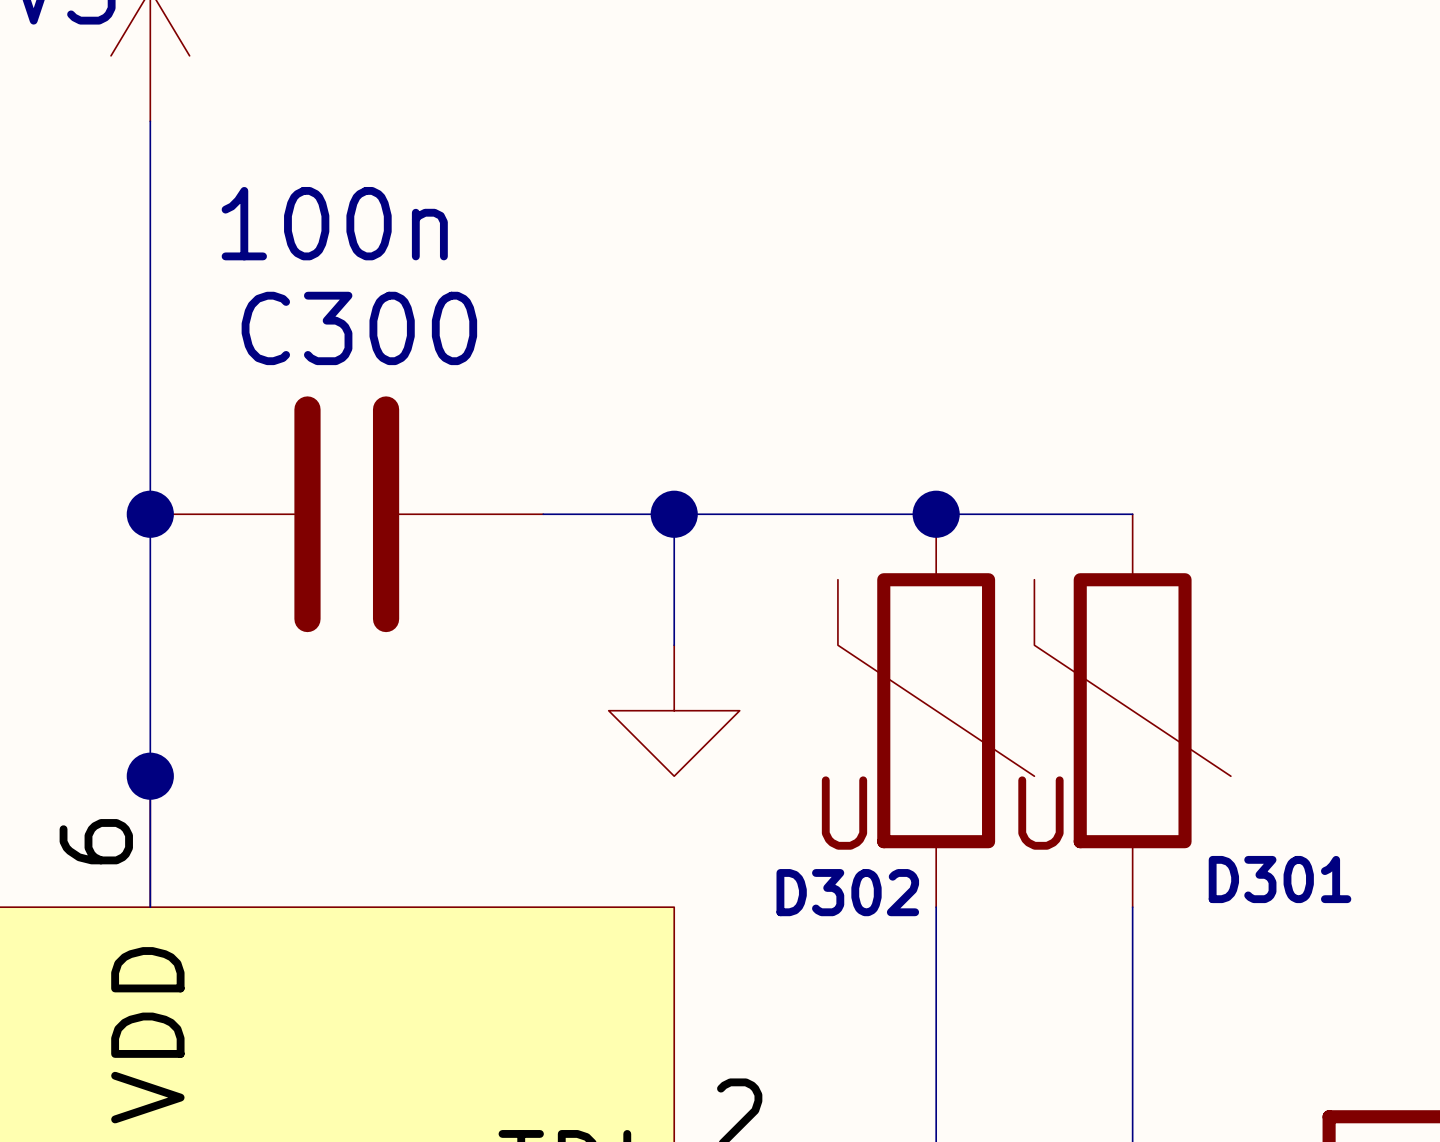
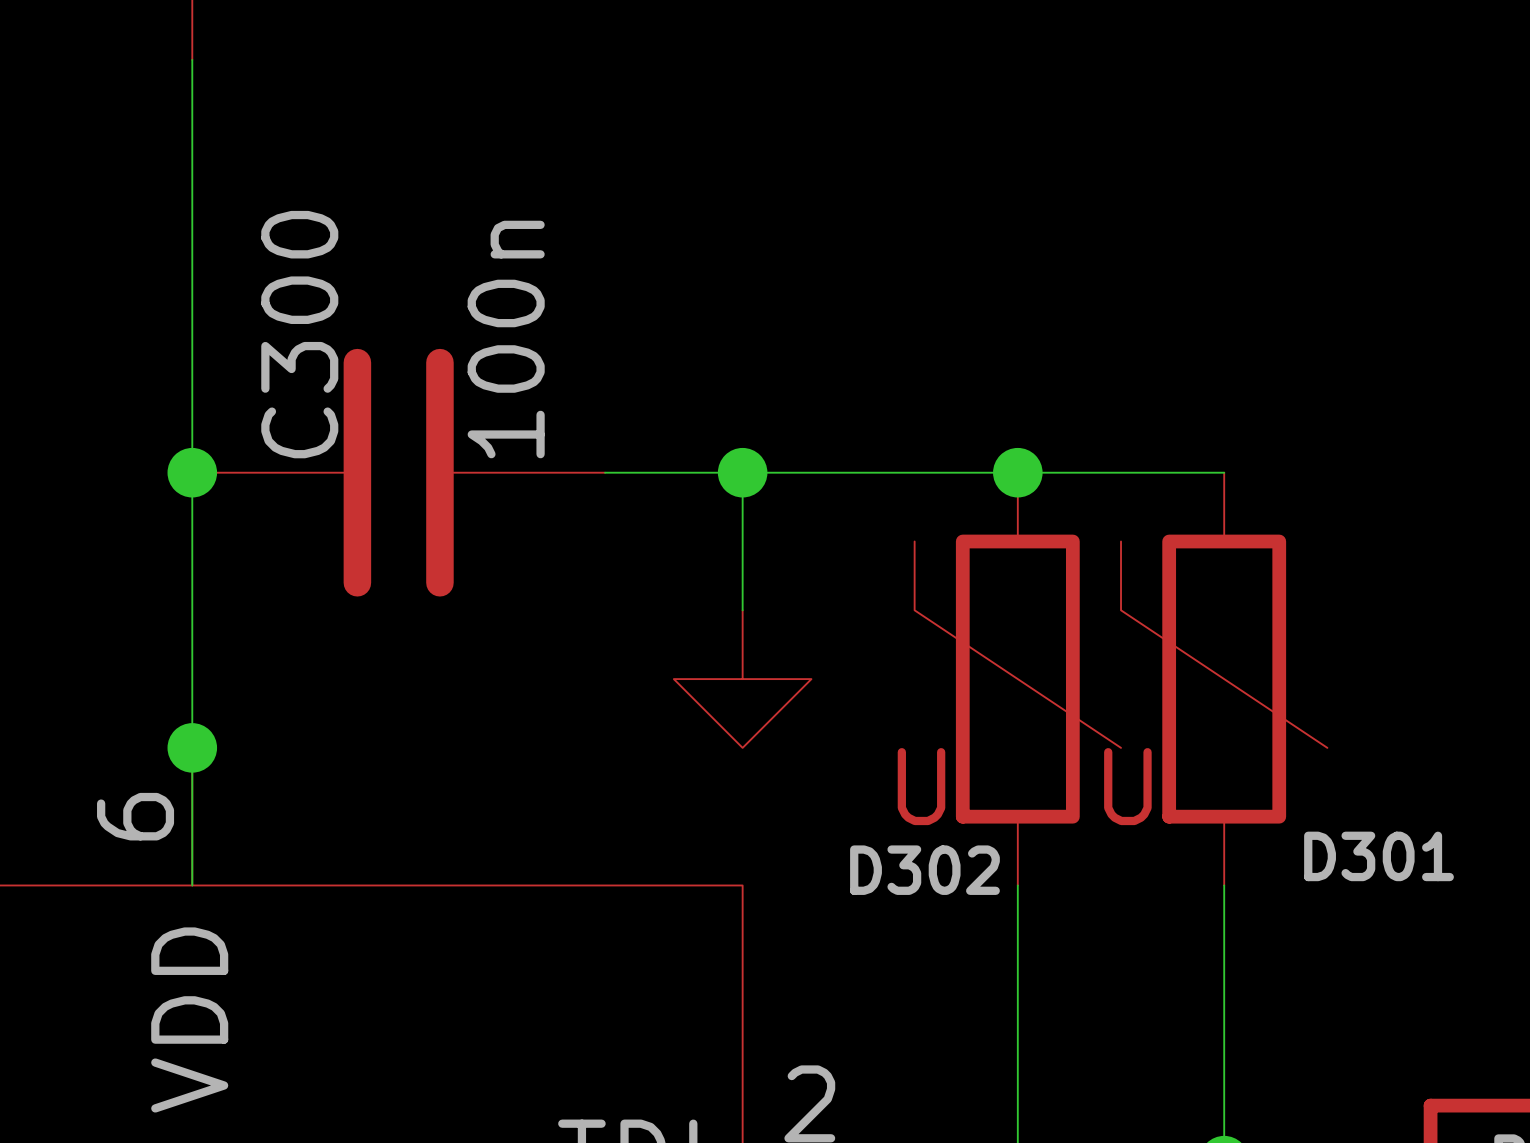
C300 value rotation: 0° (334, 223) -> 90° counterclockwise (506, 339)
C300 name rotation: 0° (359, 328) -> 90° counterclockwise (299, 334)

